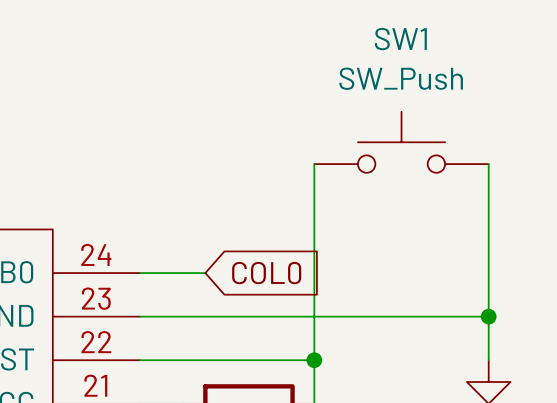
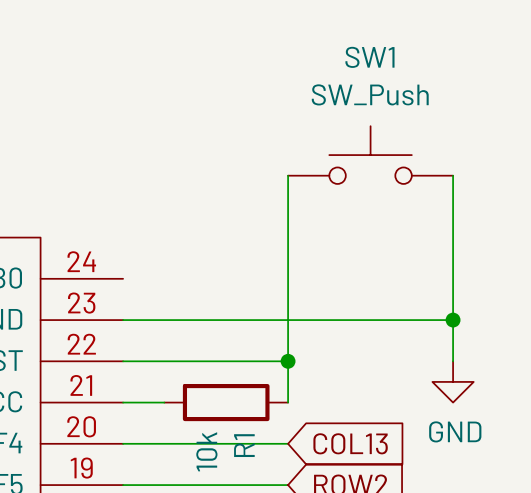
wire: (140, 273) (205, 273) -> none
global label: COL0 (266, 273) -> none

